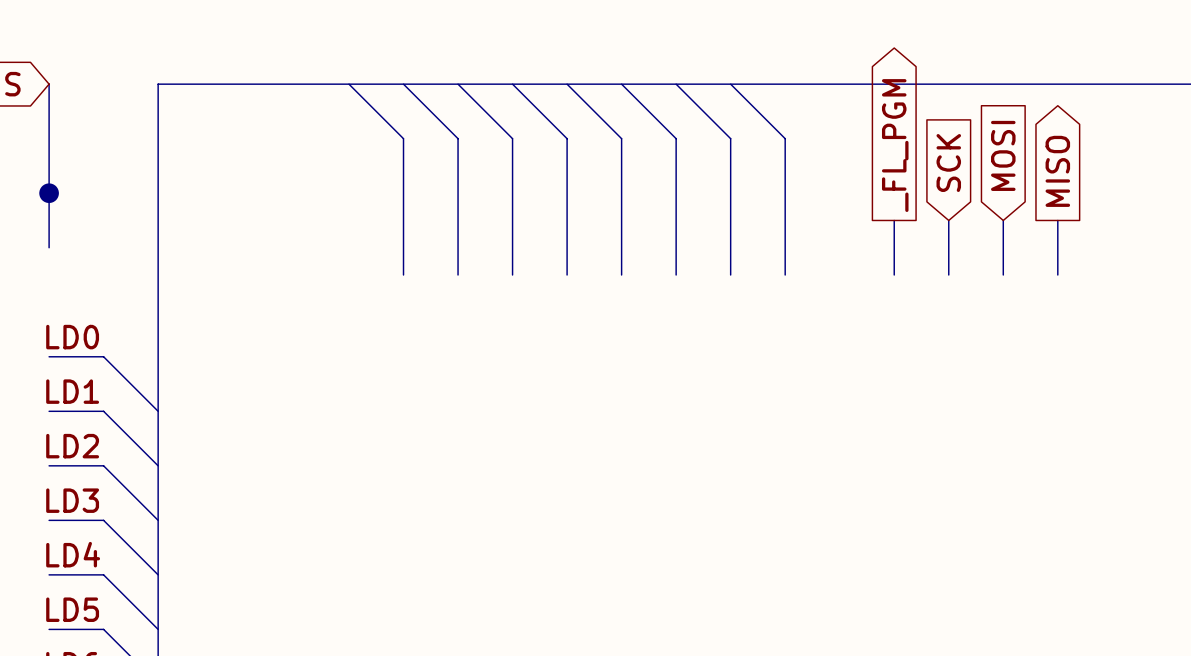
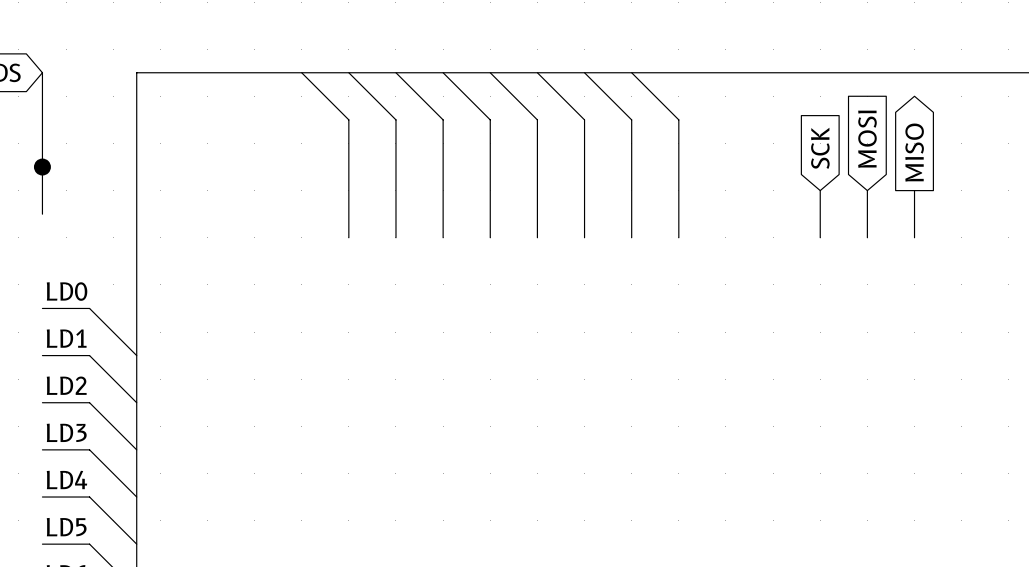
global label: _FL_PGM (895, 145) -> none
wire: (894, 220) (894, 274) -> none

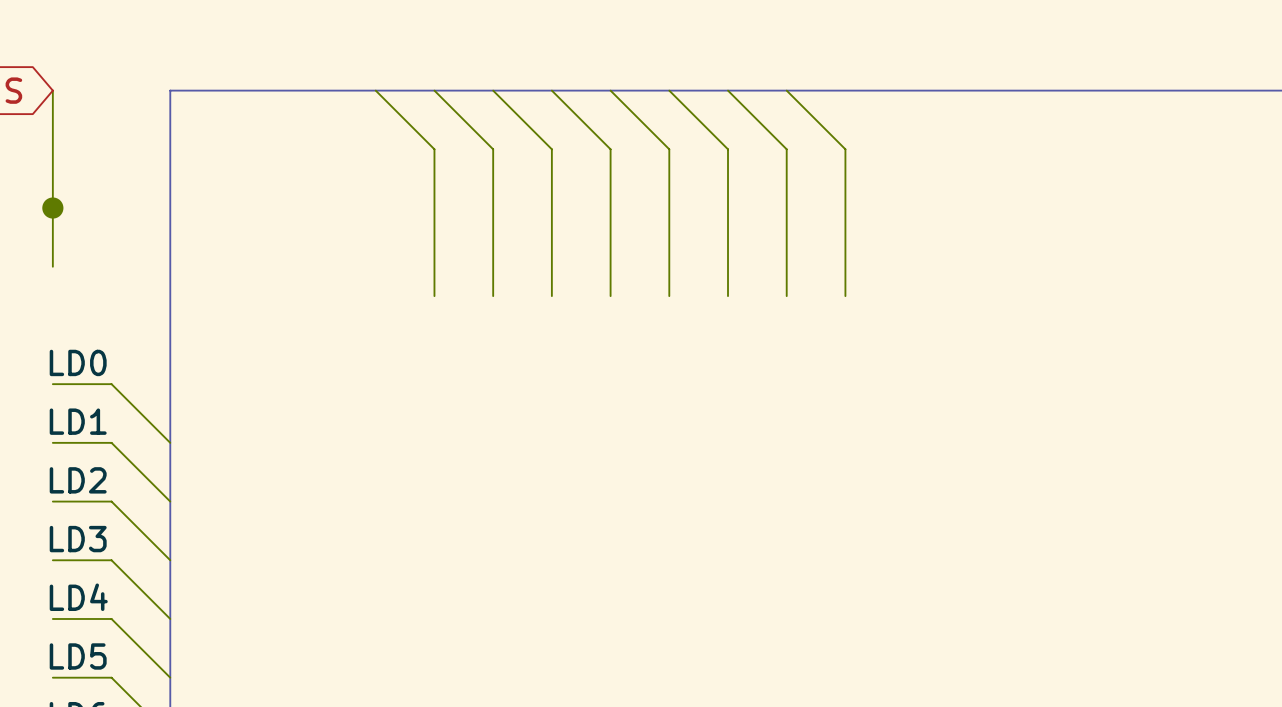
global label: MOSI (867, 139) -> none
global label: SCK (820, 148) -> none
global label: MISO (914, 152) -> none
wire: (820, 190) (820, 237) -> none
wire: (867, 190) (867, 237) -> none
wire: (914, 190) (914, 237) -> none

